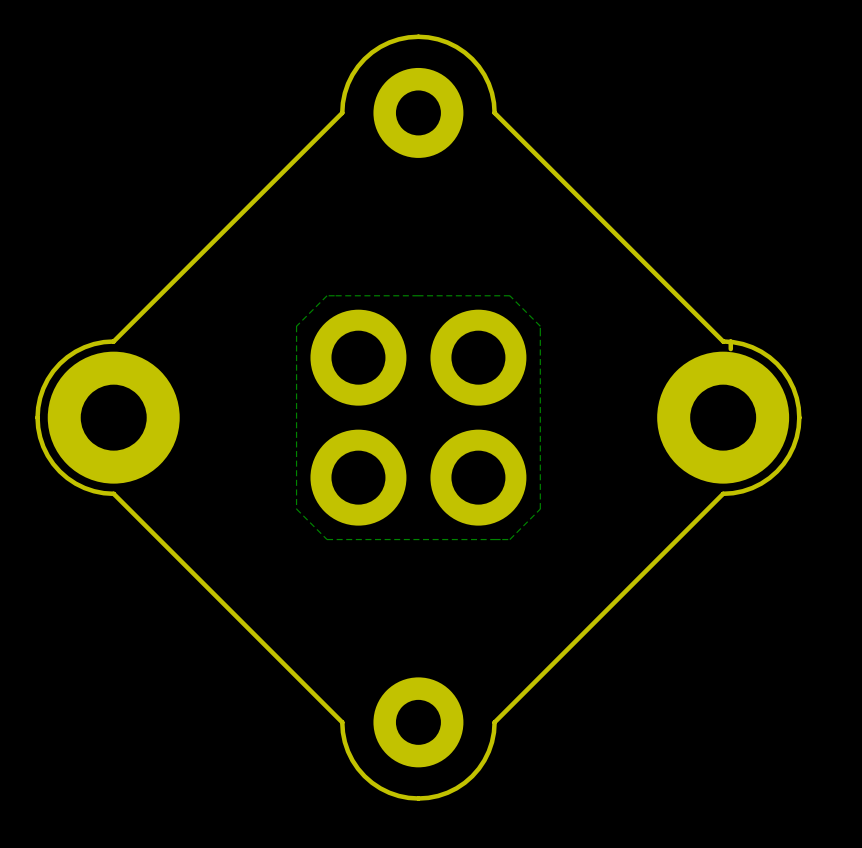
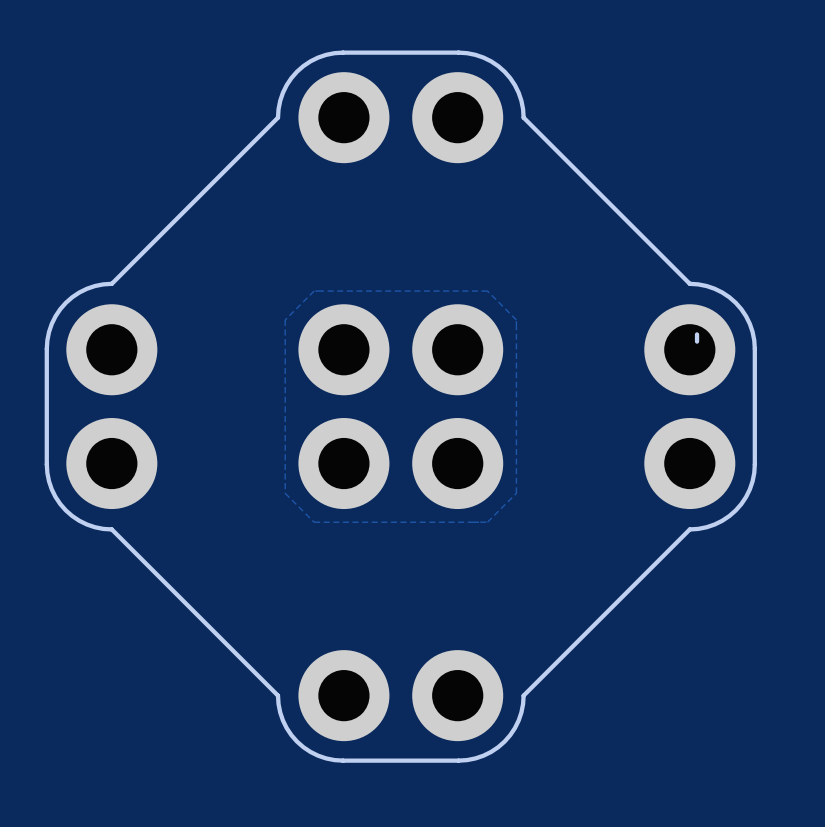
board edge: (418, 36) (447, 42) (472, 59) (488, 83) (494, 112) (723, 341) (752, 347) (777, 363) (793, 388) (799, 417) (793, 446) (777, 471) (752, 488) (723, 493) (494, 722) (488, 751) (472, 776) (447, 792) (418, 798) (389, 792) (364, 776) (348, 751) (342, 722) (113, 493) (84, 488) (59, 471) (43, 446) (37, 417) (43, 388) (59, 363) (84, 347) (113, 341) (342, 112) (348, 83) (364, 59) (389, 42) (418, 36) -> (458, 52) (483, 57) (504, 71) (518, 92) (523, 117) (689, 283) (706, 286) (722, 292) (741, 309) (749, 323) (754, 340) (754, 472) (746, 496) (735, 510) (714, 524) (689, 529) (523, 695) (521, 712) (514, 728) (498, 747) (483, 755) (467, 760) (334, 760) (310, 751) (297, 741) (282, 720) (278, 695) (111, 529) (95, 527) (79, 520) (60, 504) (51, 489) (47, 472) (47, 340) (51, 323) (65, 302) (86, 288) (111, 283) (278, 117) (280, 100) (286, 85) (303, 66) (318, 57) (334, 53) (458, 52)
part footprint: [373, 67, 464, 158] -> [298, 72, 504, 164]
part footprint: [47, 351, 180, 484] -> [66, 304, 158, 510]
part footprint: [657, 351, 790, 484] -> [644, 304, 736, 510]
part footprint: [373, 677, 464, 768] -> [298, 650, 504, 742]

